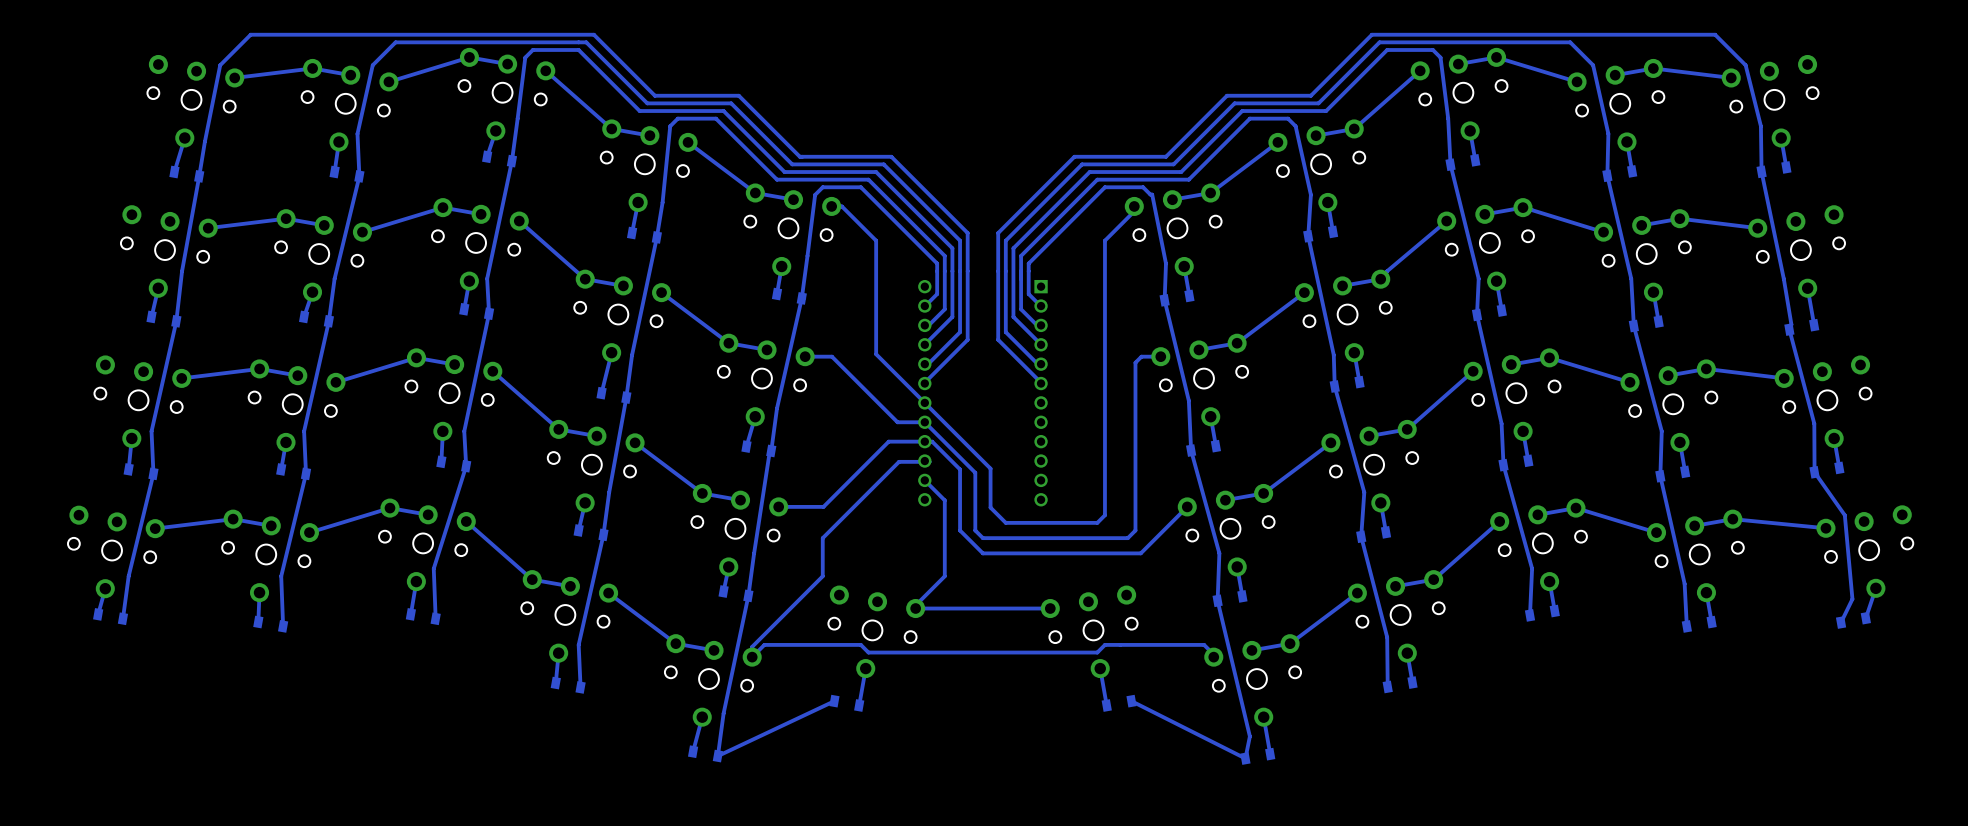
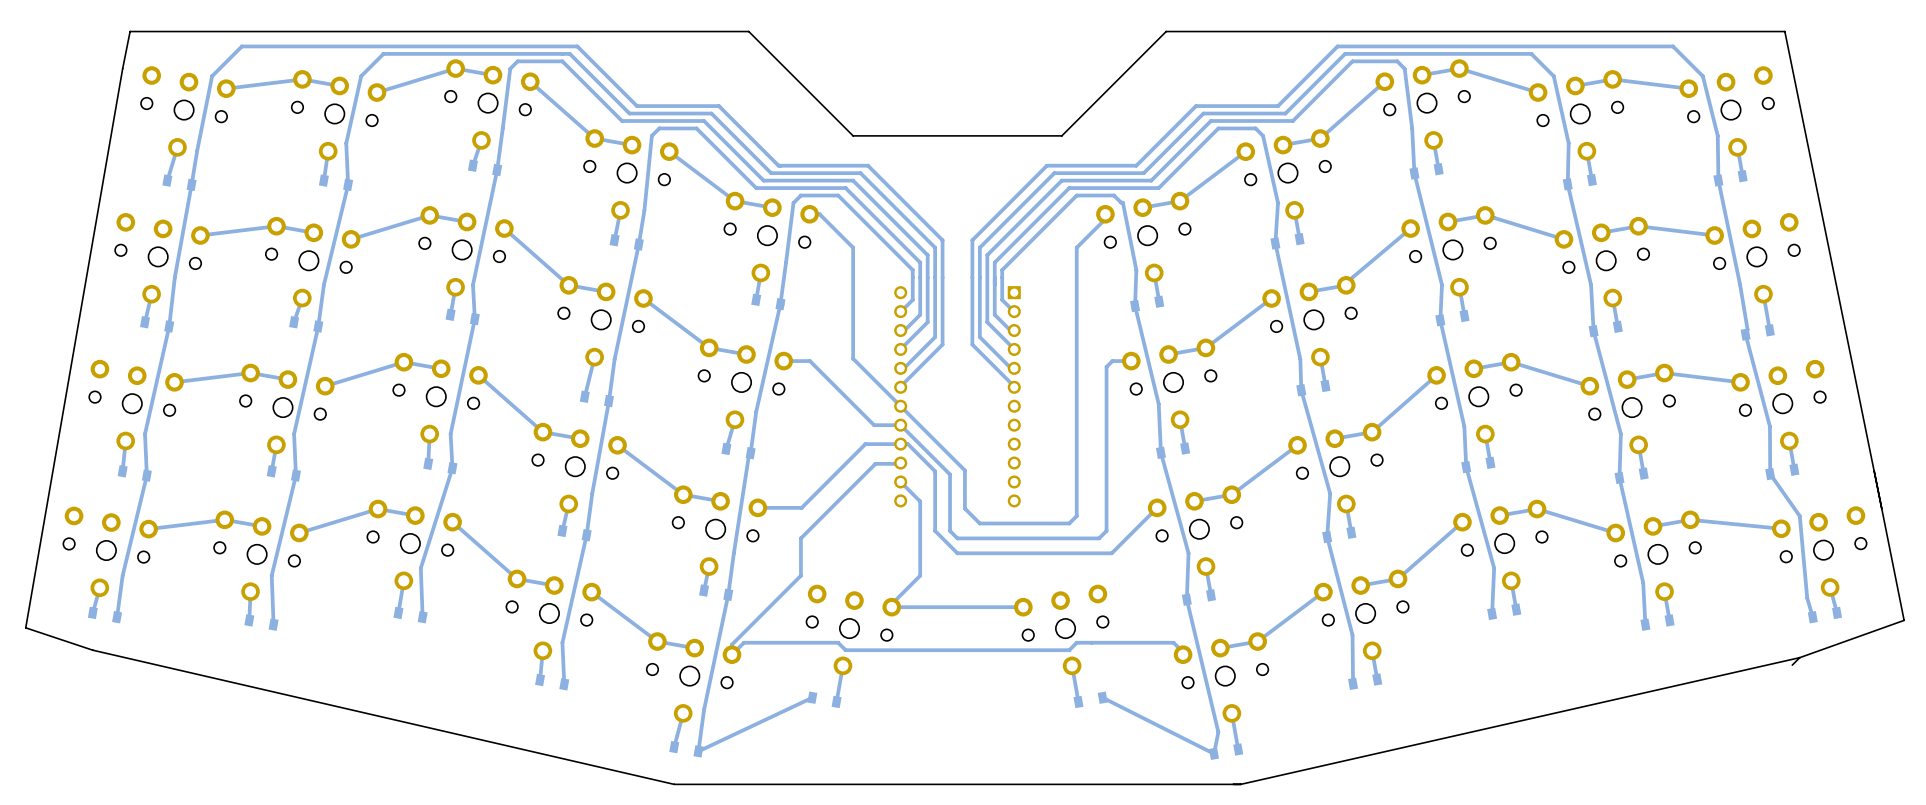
board edge: none -> (1874, 471) (1904, 620) (1799, 657)
board edge: none -> (1881, 508) (1784, 31) (1166, 31) (1061, 135) (853, 135) (748, 31) (130, 31) (25, 627) (92, 650) (674, 784) (1240, 784) (1799, 657)
bottom track: (1875, 588) (1865, 618) -> (1830, 587) (1837, 612)
bottom track: (1852, 599) (1841, 622) -> (1807, 598) (1812, 617)
part position: (1853, 620) -> (1824, 615)
board edge: none -> (1799, 657) (1792, 665)

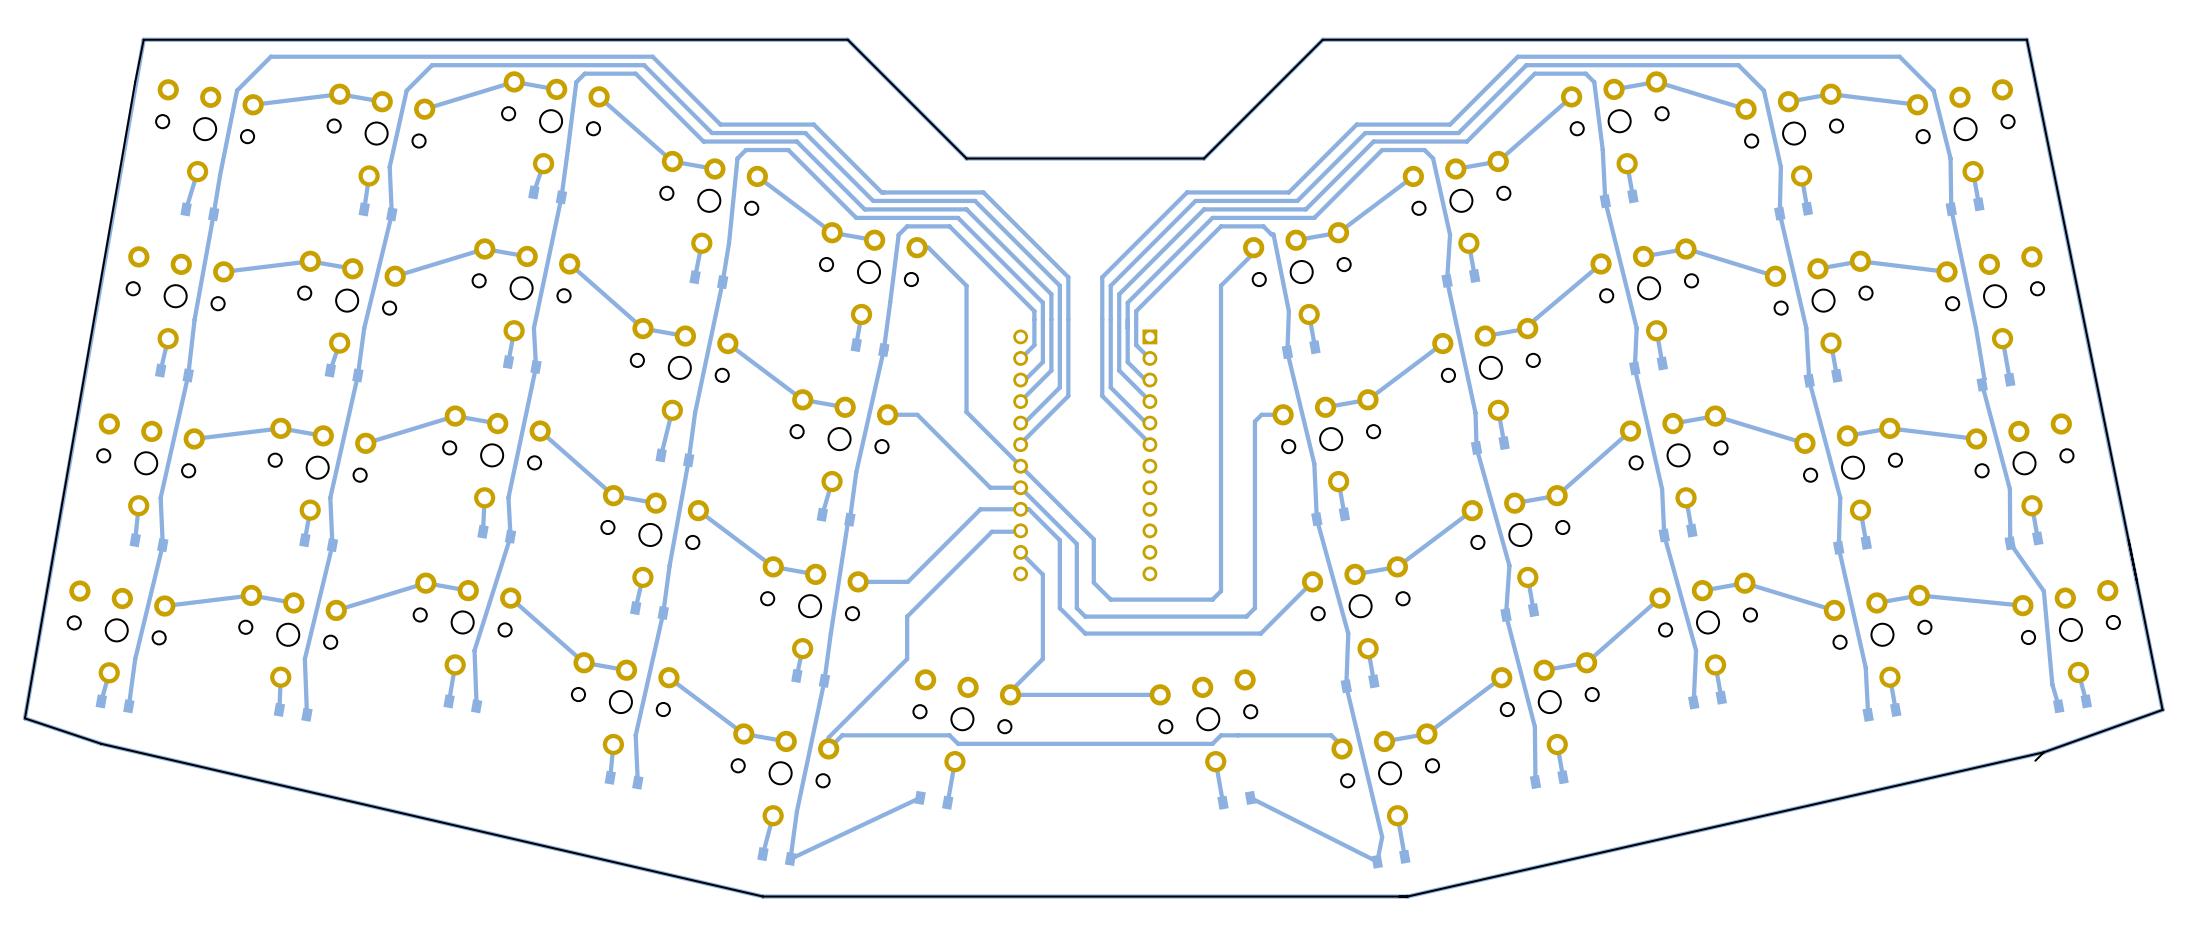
bottom track: none -> (2026, 39) (1322, 39) (1204, 158) (966, 158) (847, 39) (143, 39) (24, 718) (101, 743) (762, 896) (1407, 896) (2043, 752) (2162, 709) (2026, 39)

